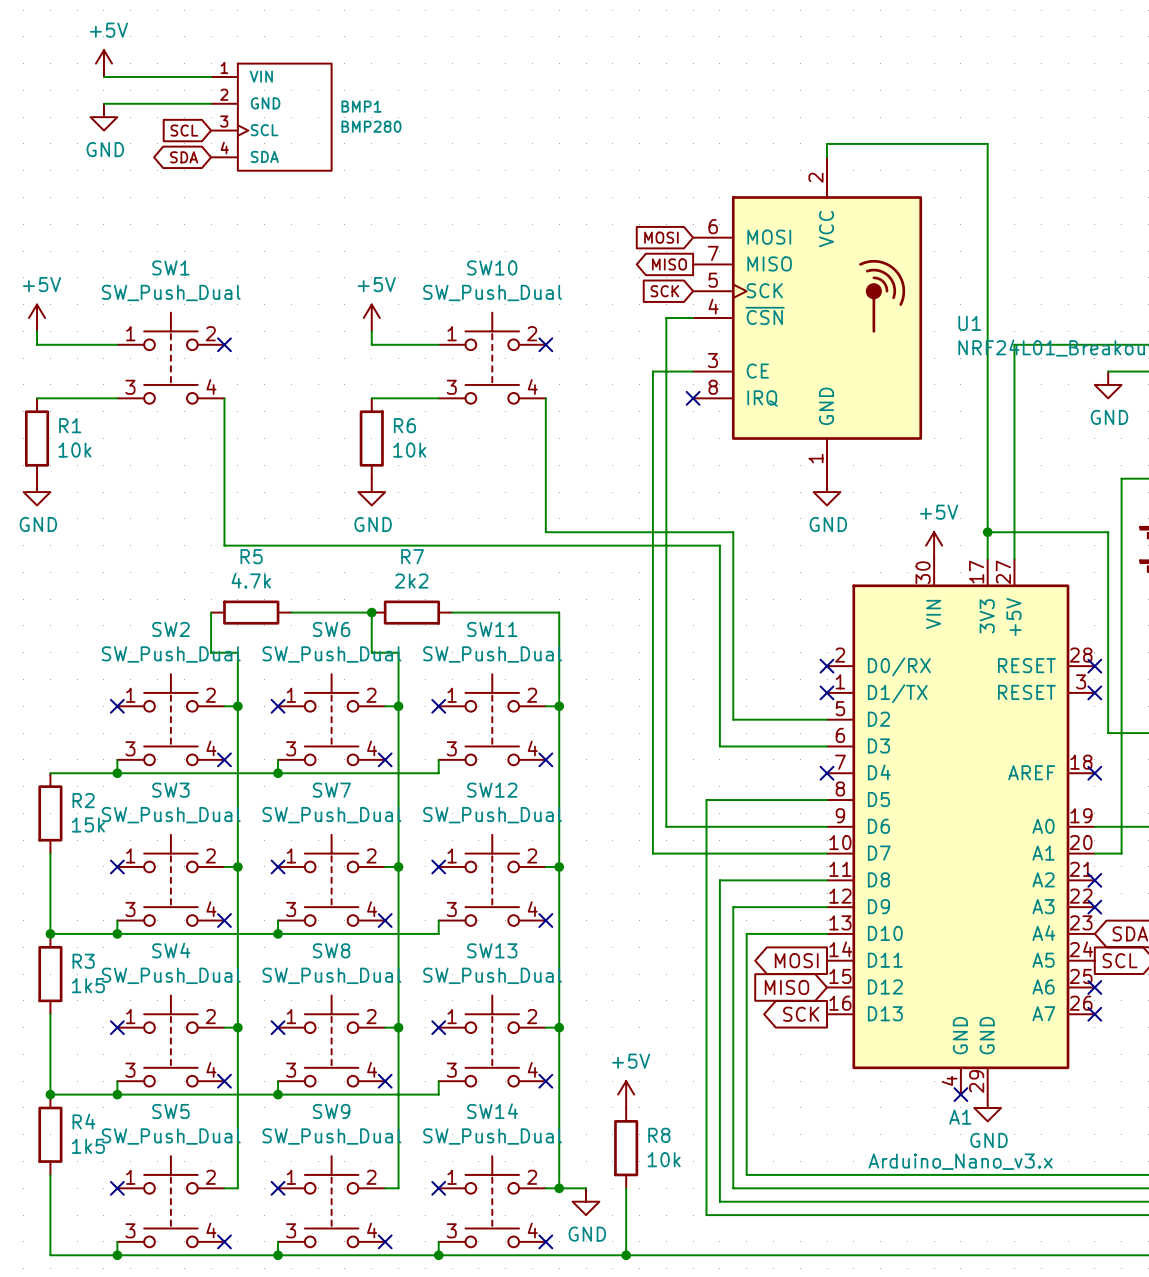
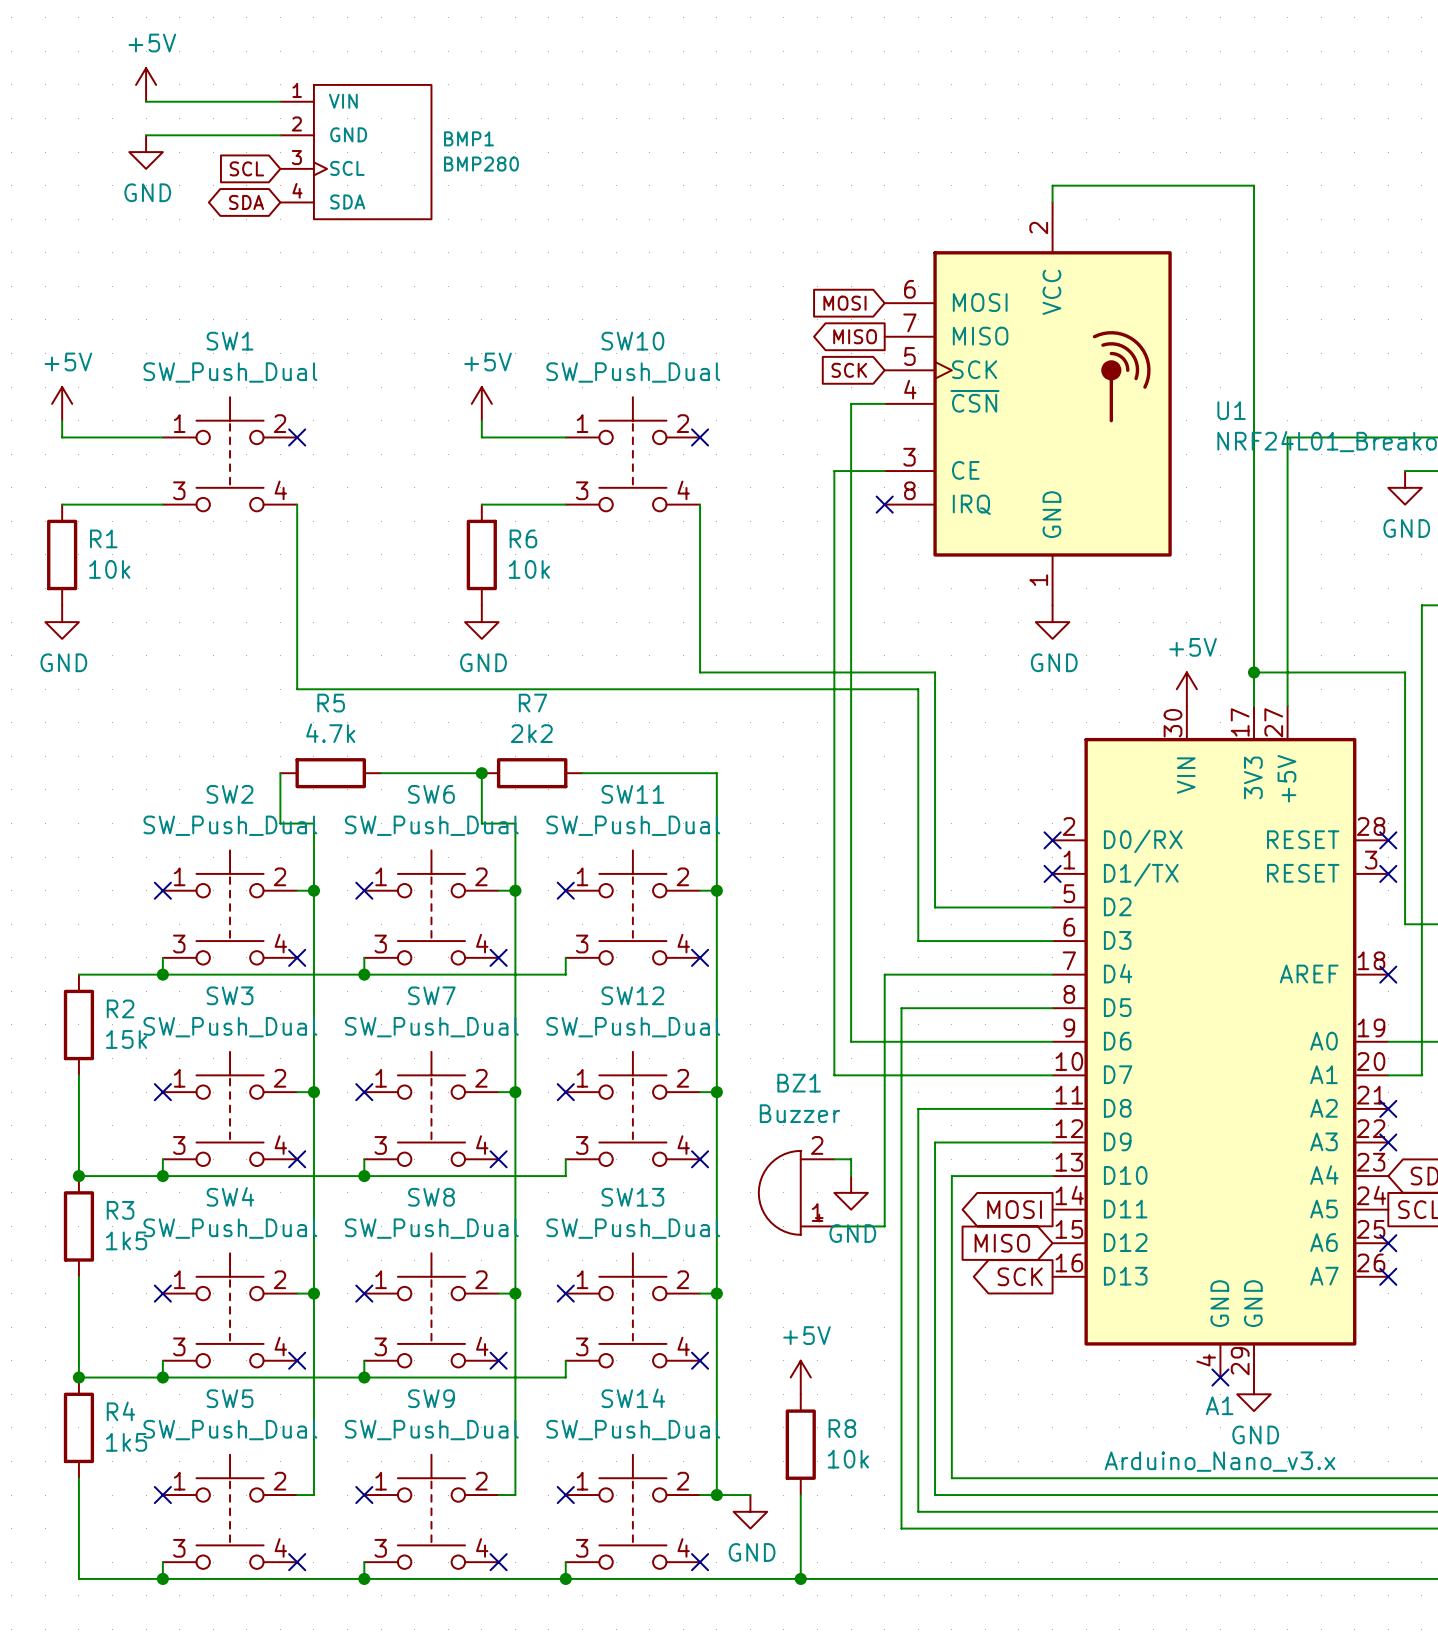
wire: none -> (1052, 974) (884, 974) (884, 1226) (834, 1226)
no-connect mark: (827, 773) -> none
wire: none -> (834, 1159) (851, 1159) (851, 1176)
BZ1: none -> Buzzer (796, 1192)
power symbol: none -> GND (851, 1192)

